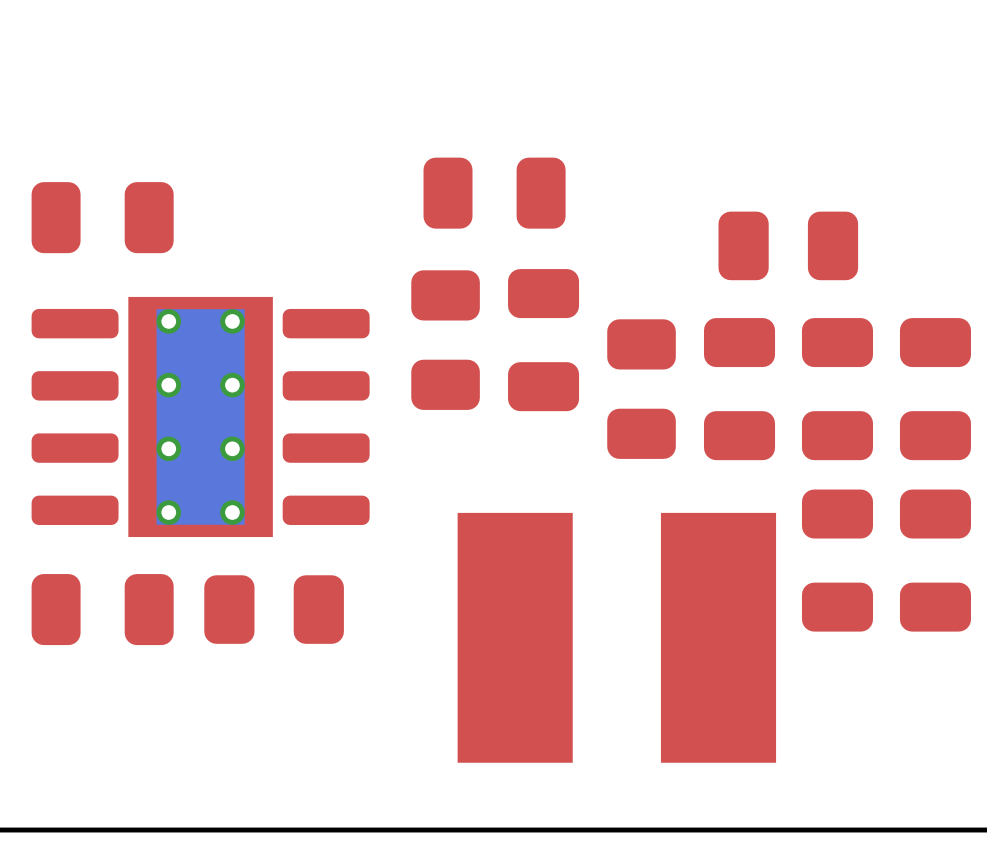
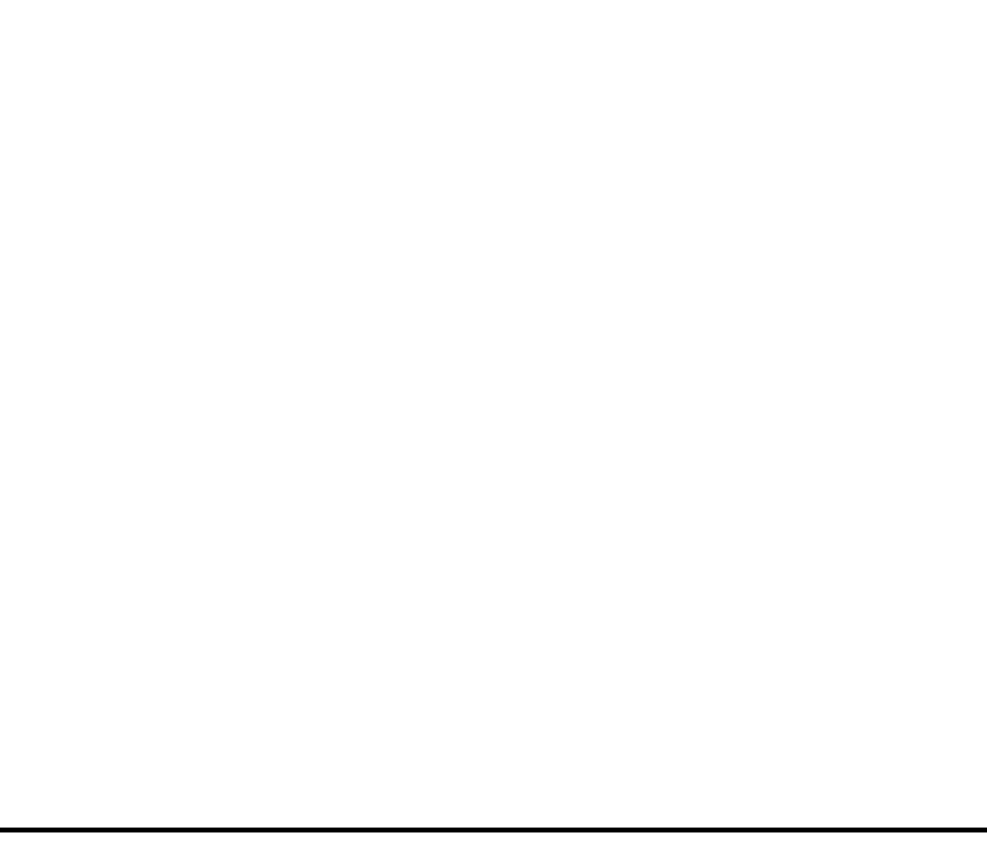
part: (494, 193) -> none
part: (102, 217) -> none
part: (788, 245) -> none
part: (445, 340) -> none
part: (543, 340) -> none
part: (641, 389) -> none
part: (739, 389) -> none
part: (837, 389) -> none
part: (935, 389) -> none
part: (200, 416) -> none
part: (837, 560) -> none
part: (935, 560) -> none
part: (102, 609) -> none
part: (274, 609) -> none
part: (616, 637) -> none

